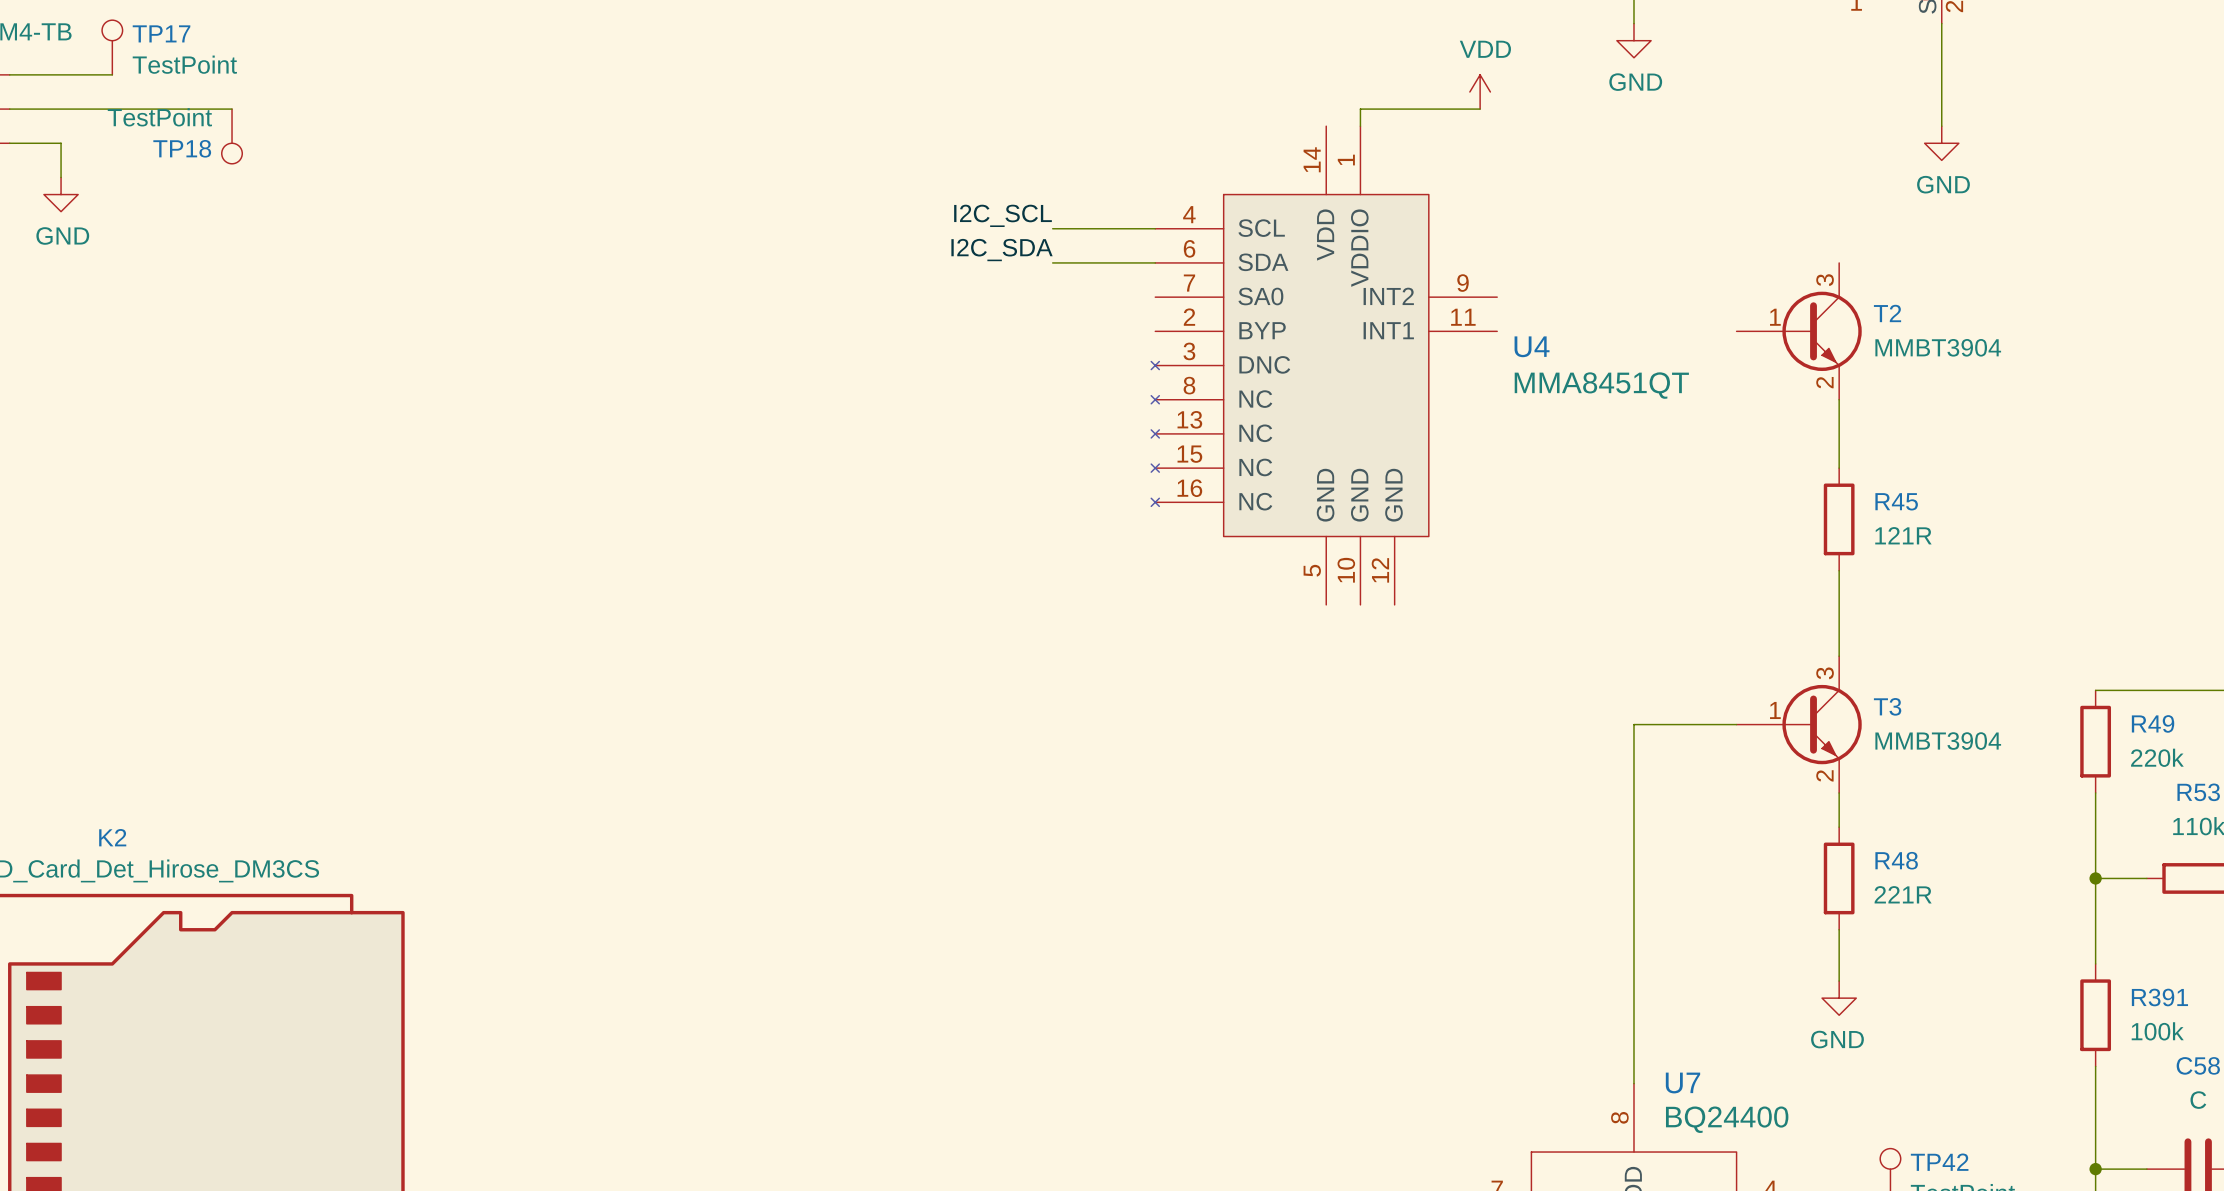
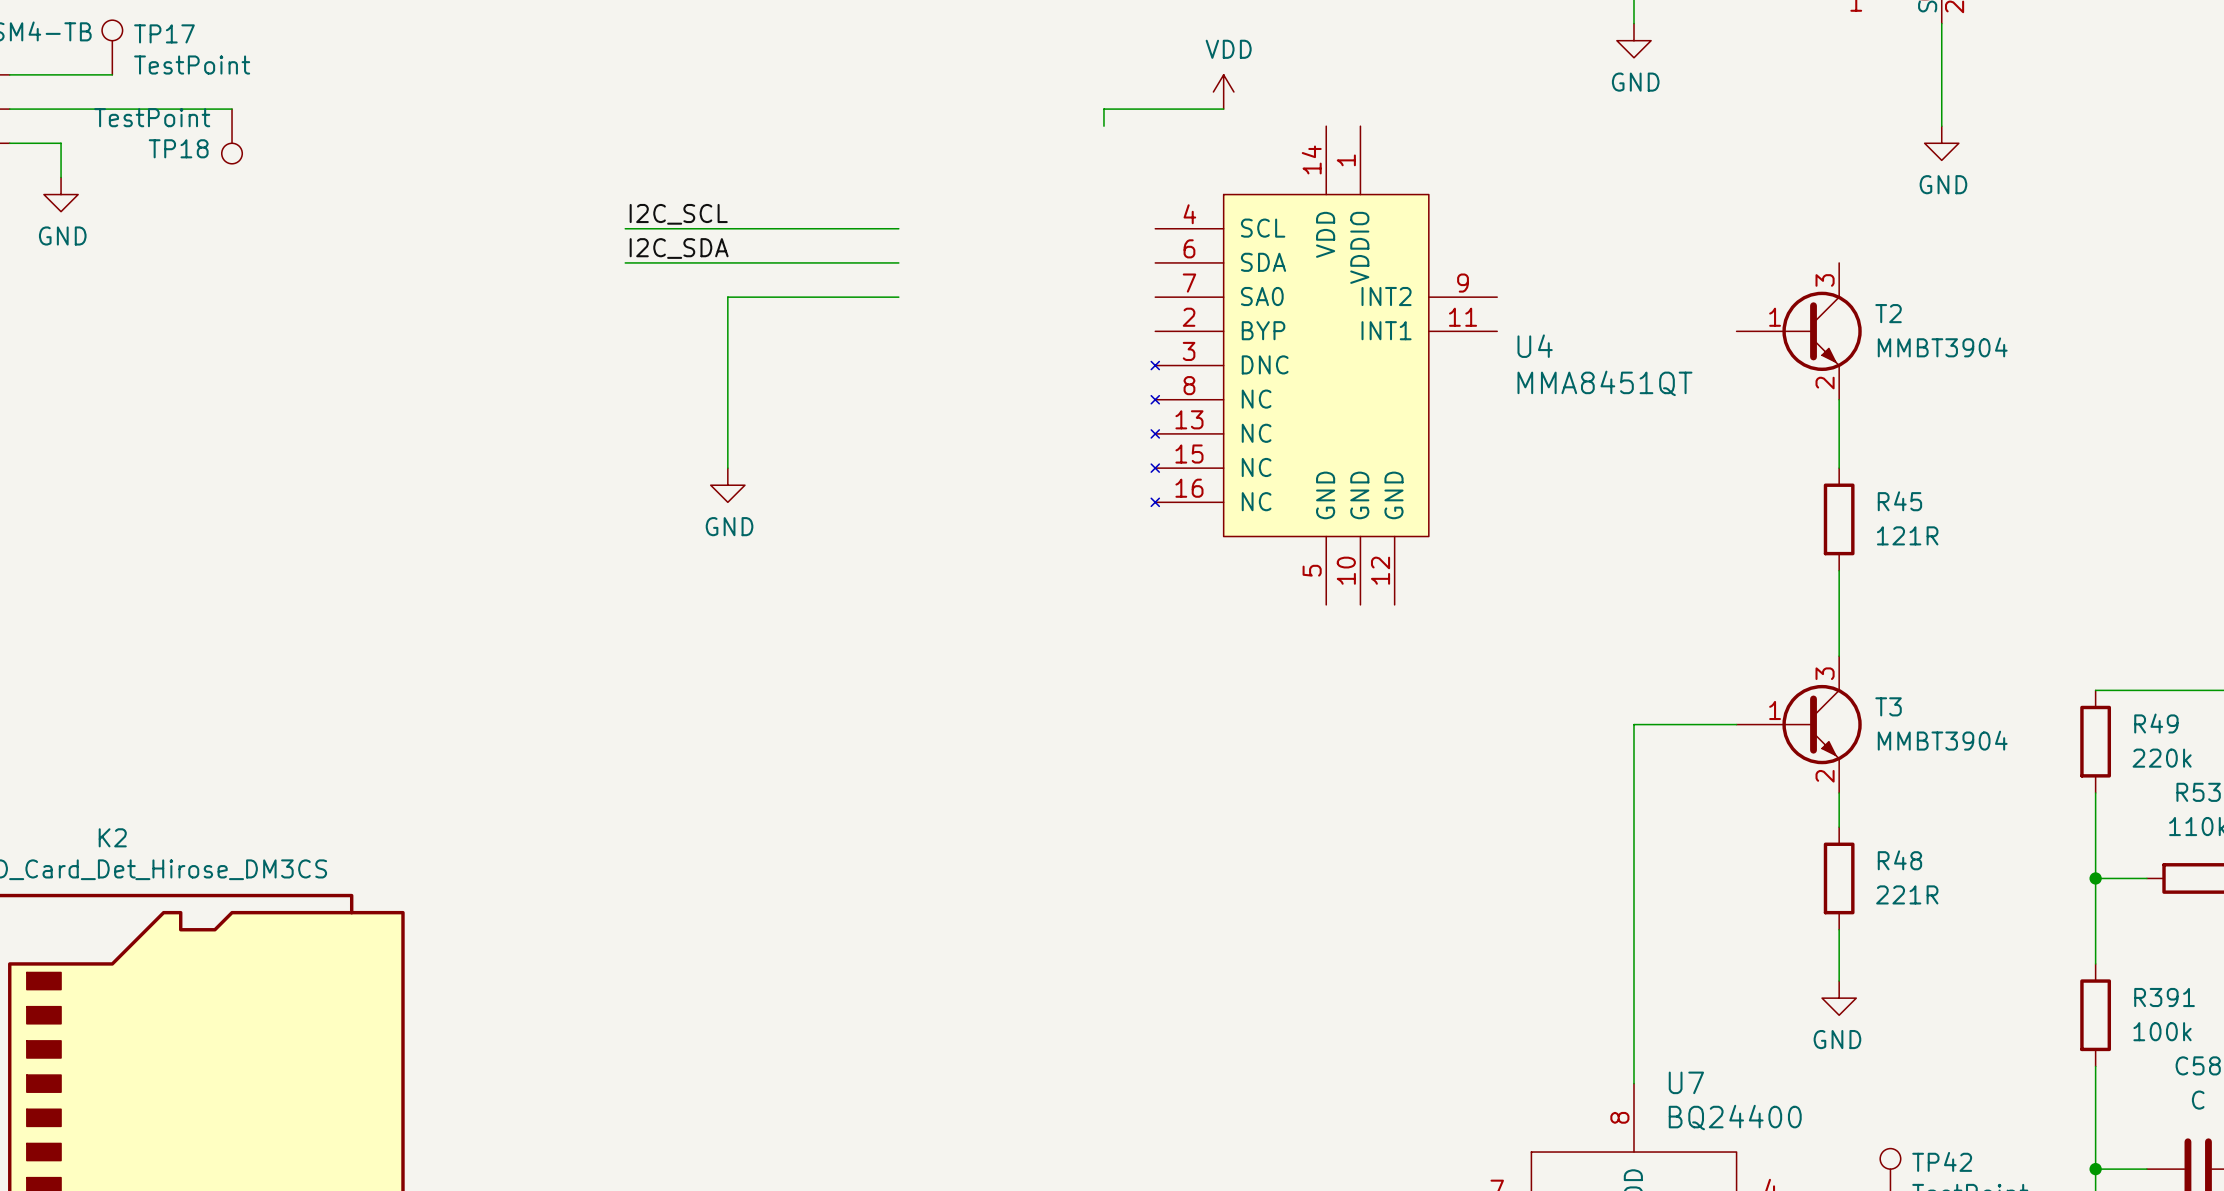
power symbol position: VDD (1480, 91) -> VDD (1223, 91)
wire: (1480, 109) (1360, 109) (1360, 126) -> (1223, 109) (1103, 109) (1103, 126)
label: none -> I2C_SCL (678, 214)
label: I2C_SCL (1003, 215) -> none
wire: none -> (625, 228) (898, 228)
wire: (1052, 228) (1155, 228) -> none
label: none -> I2C_SDA (679, 248)
label: I2C_SDA (1002, 250) -> none
wire: none -> (625, 262) (898, 262)
wire: (1052, 262) (1155, 262) -> none
wire: none -> (898, 297) (727, 297) (727, 468)
power symbol: none -> GND (727, 485)

